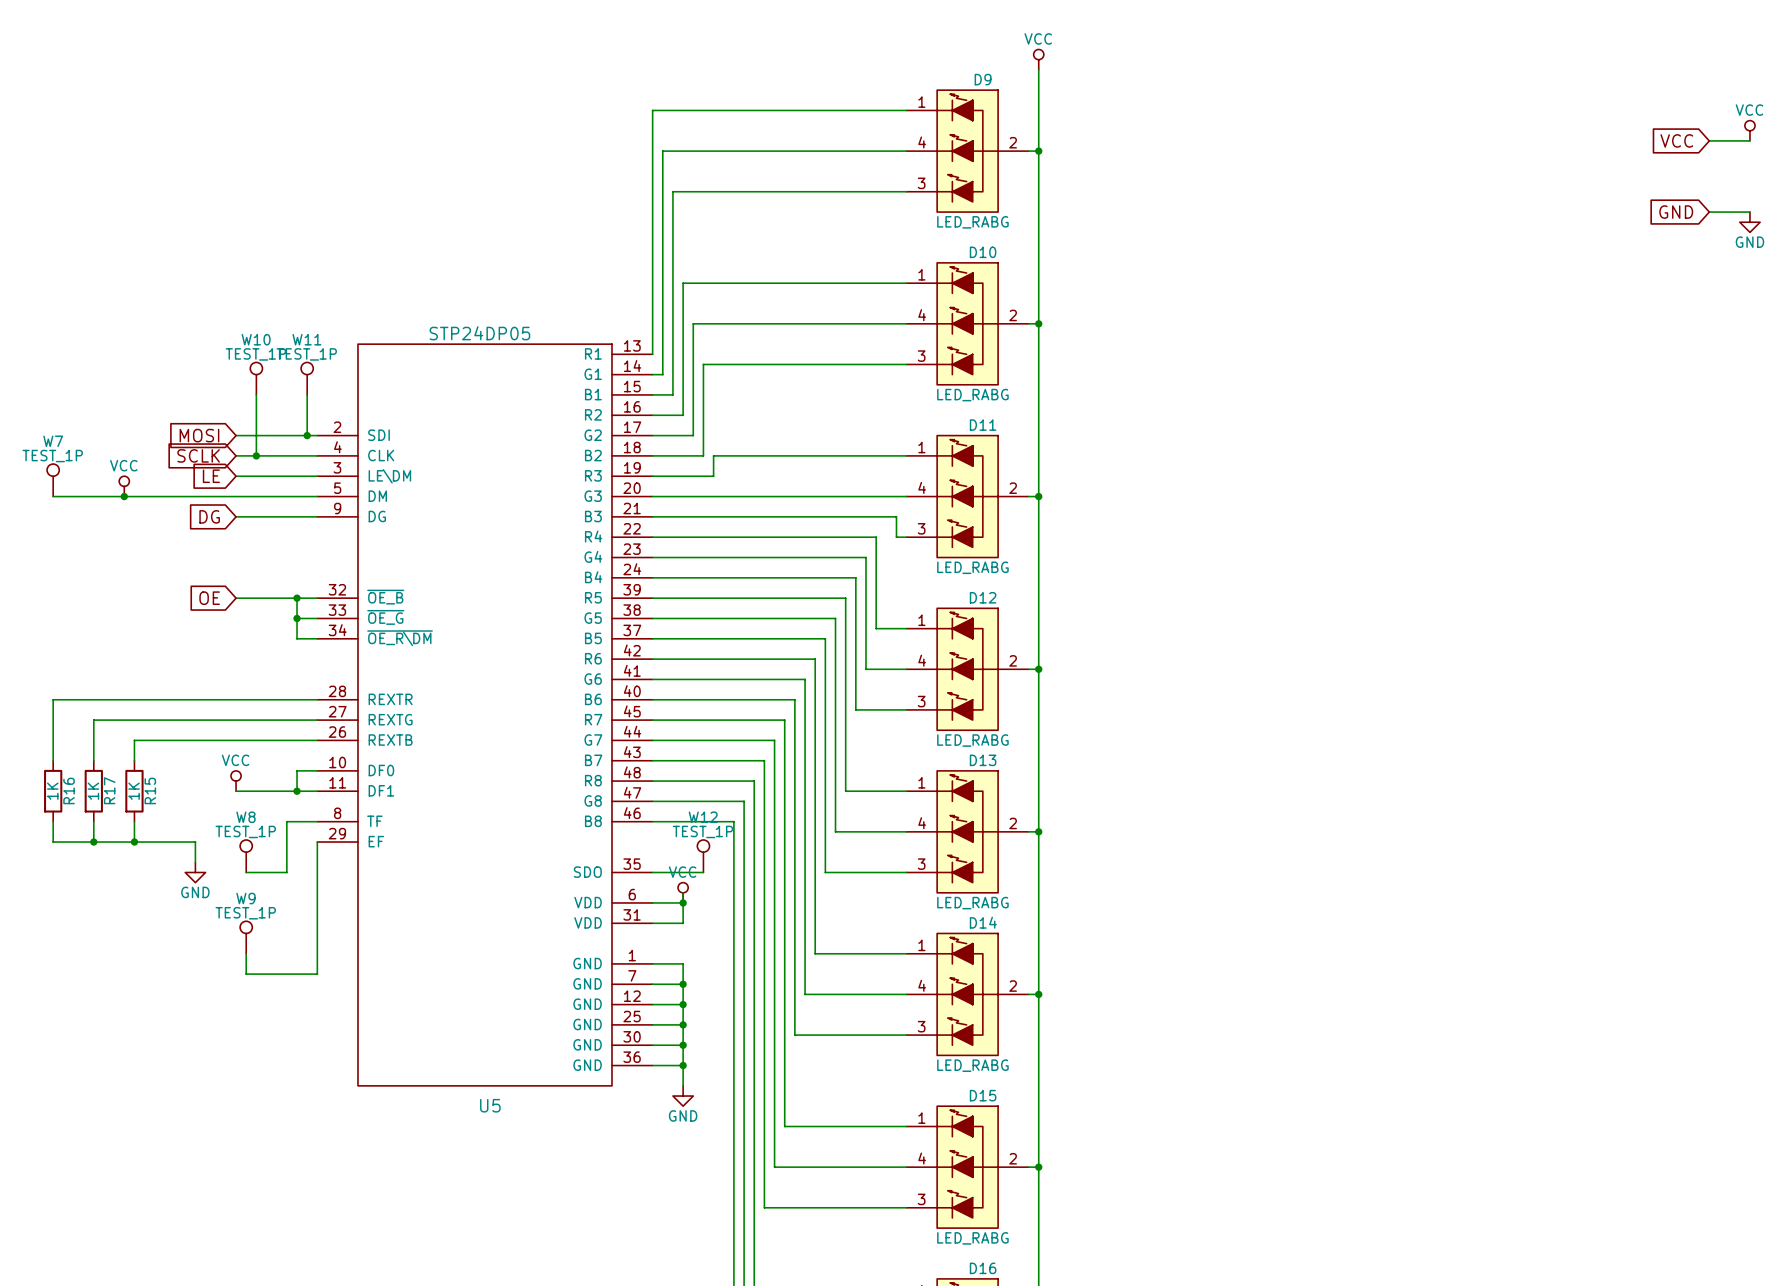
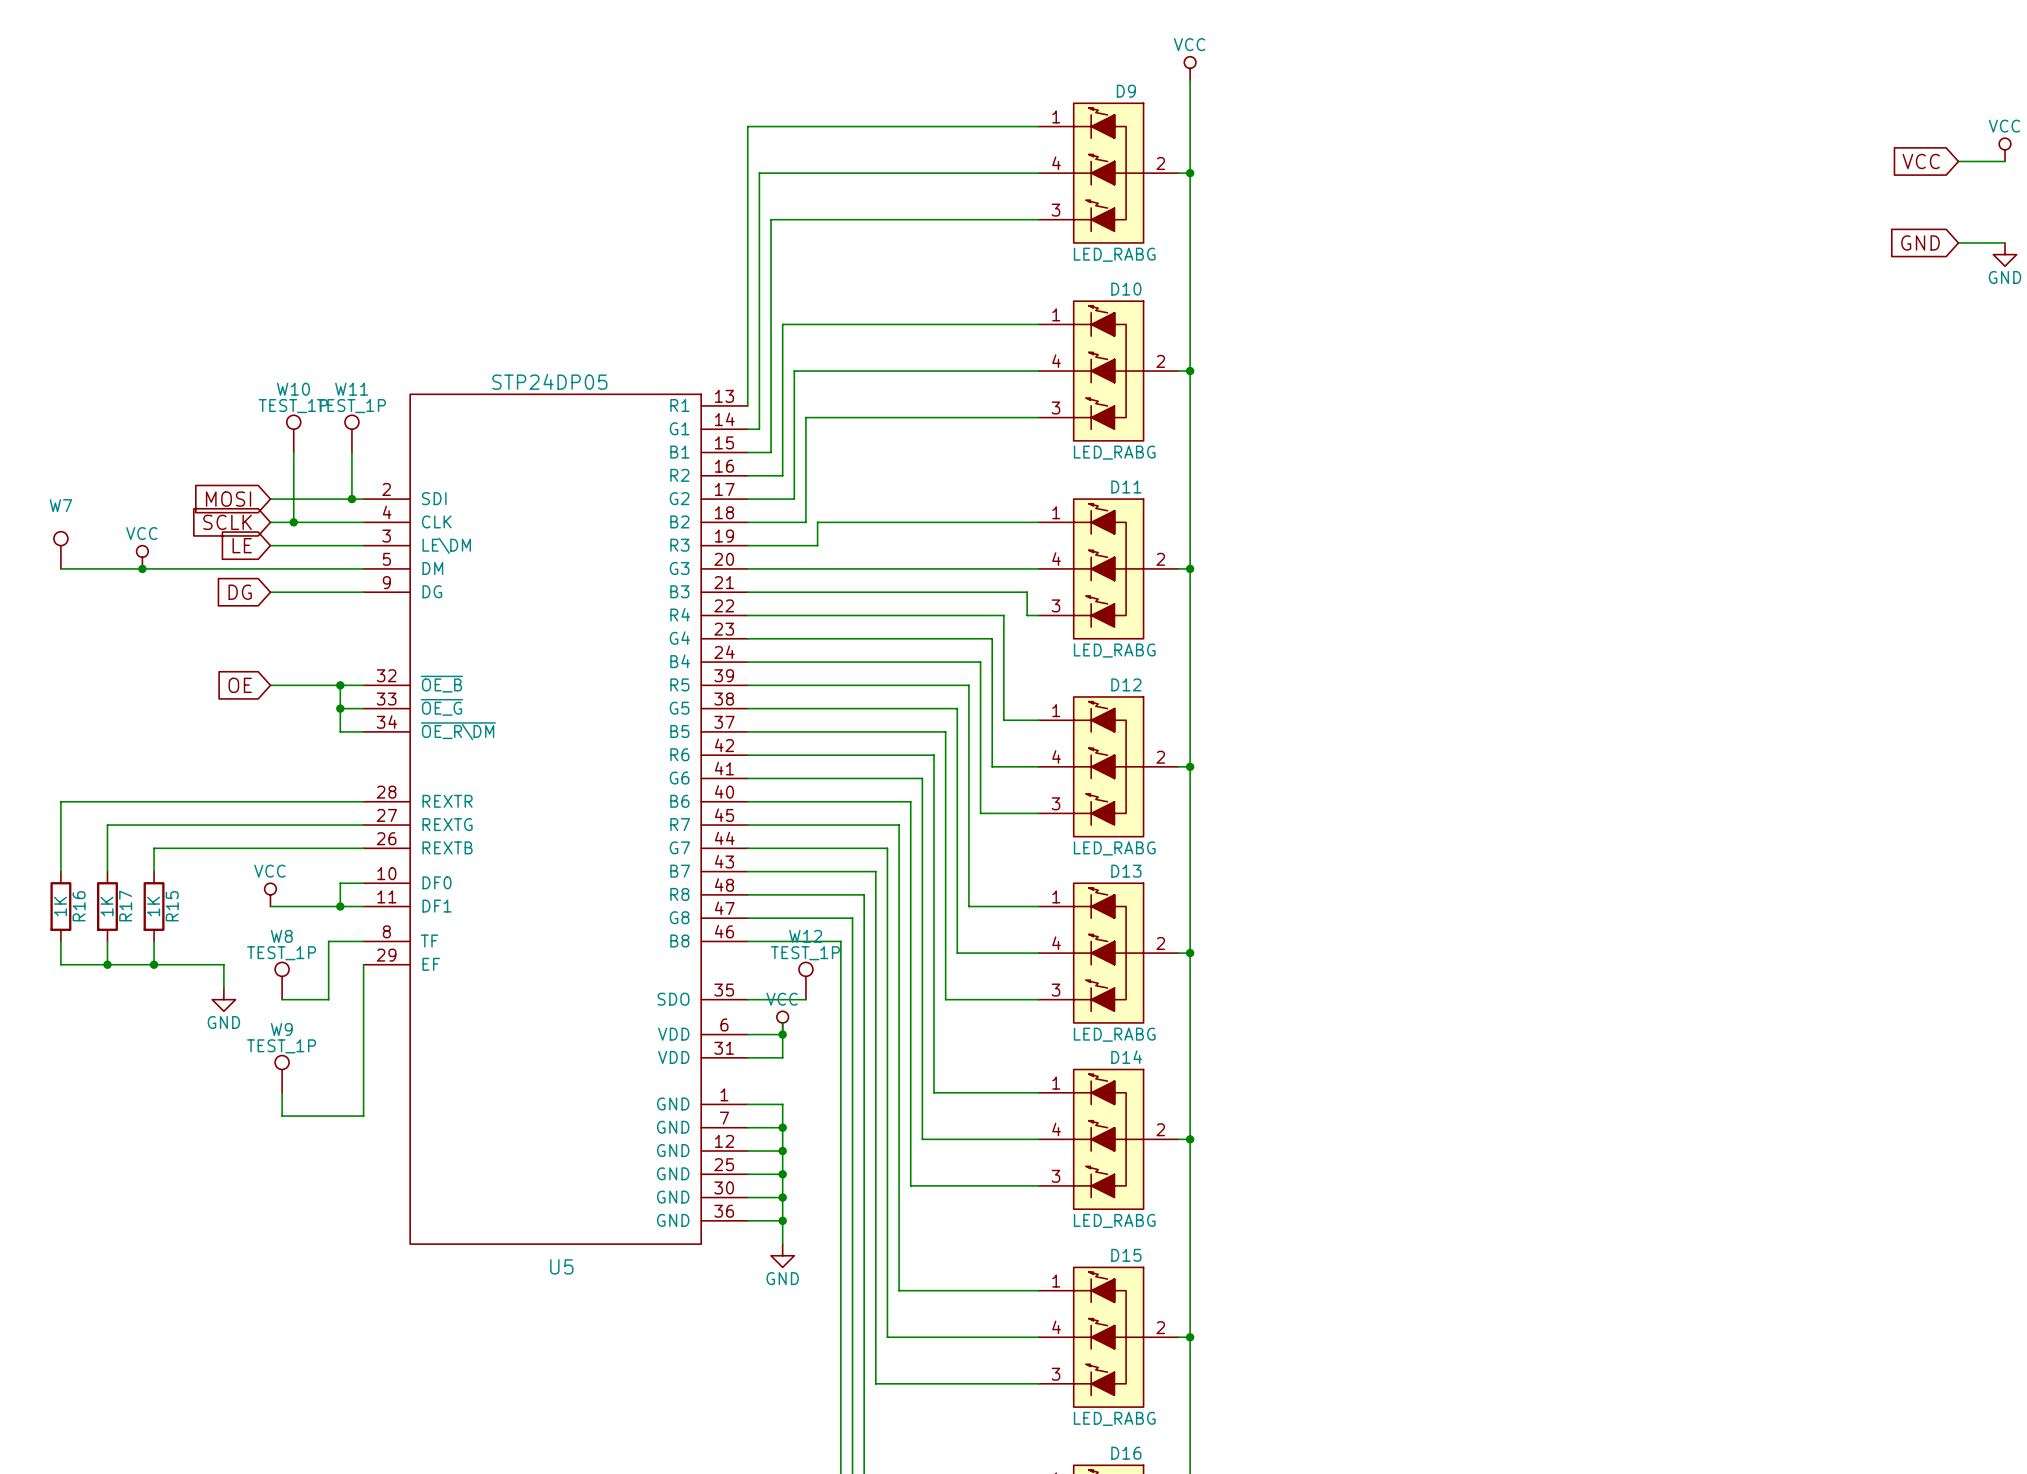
W7 value: TEST_1P (52, 456) -> none

